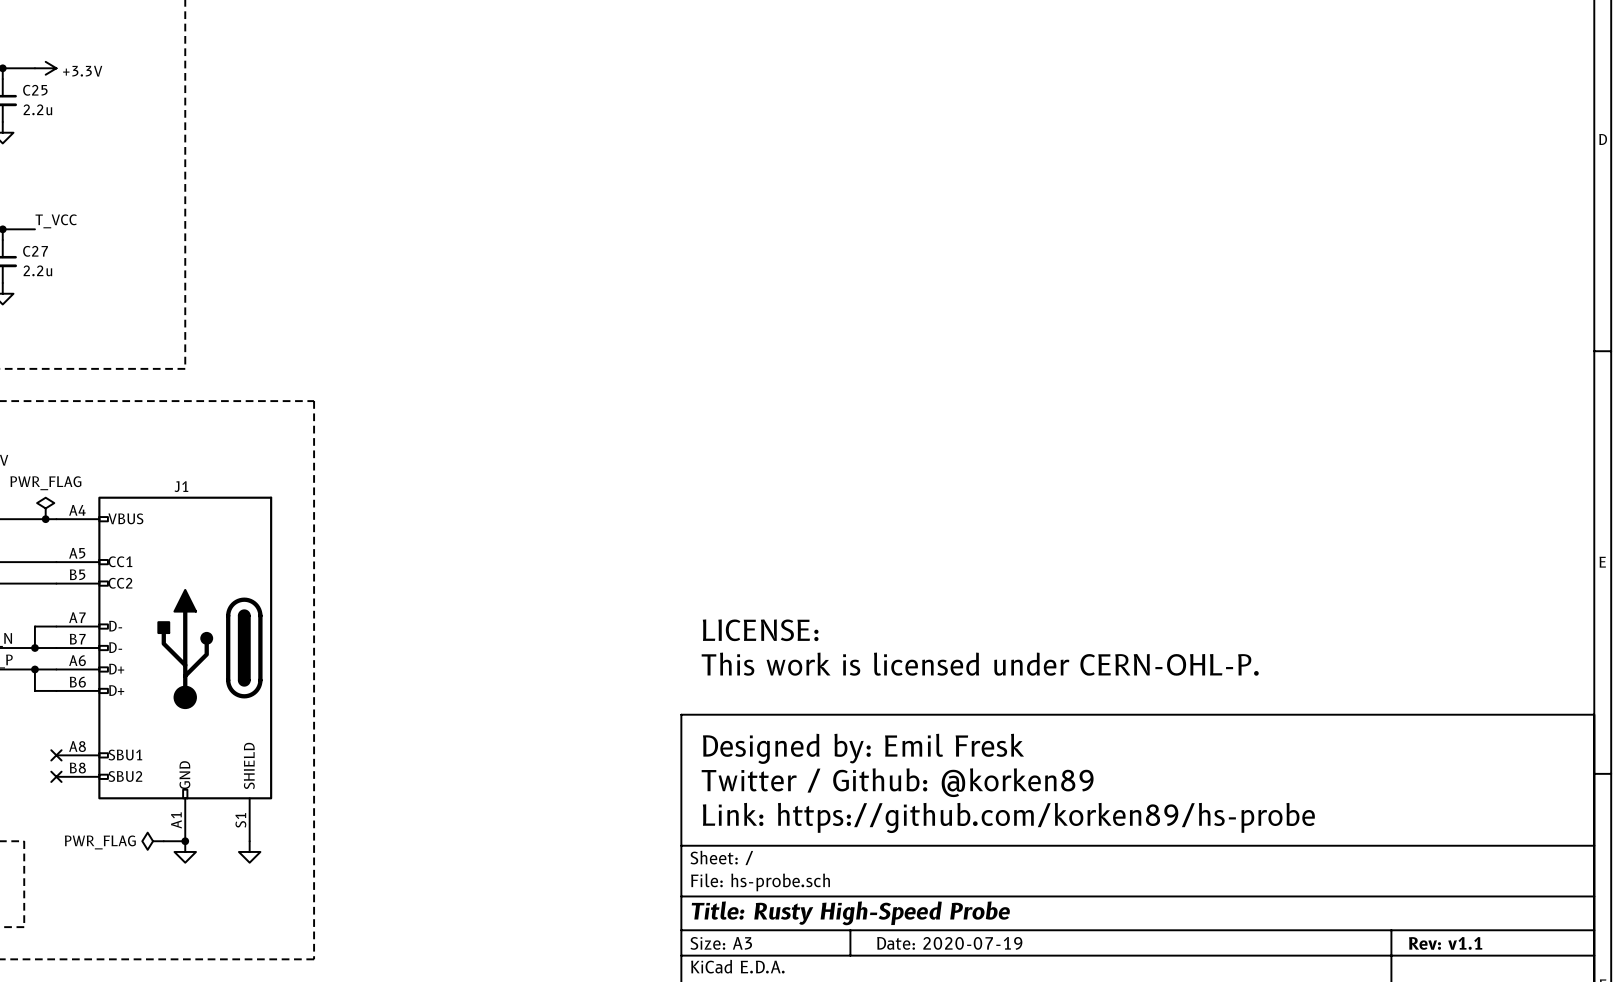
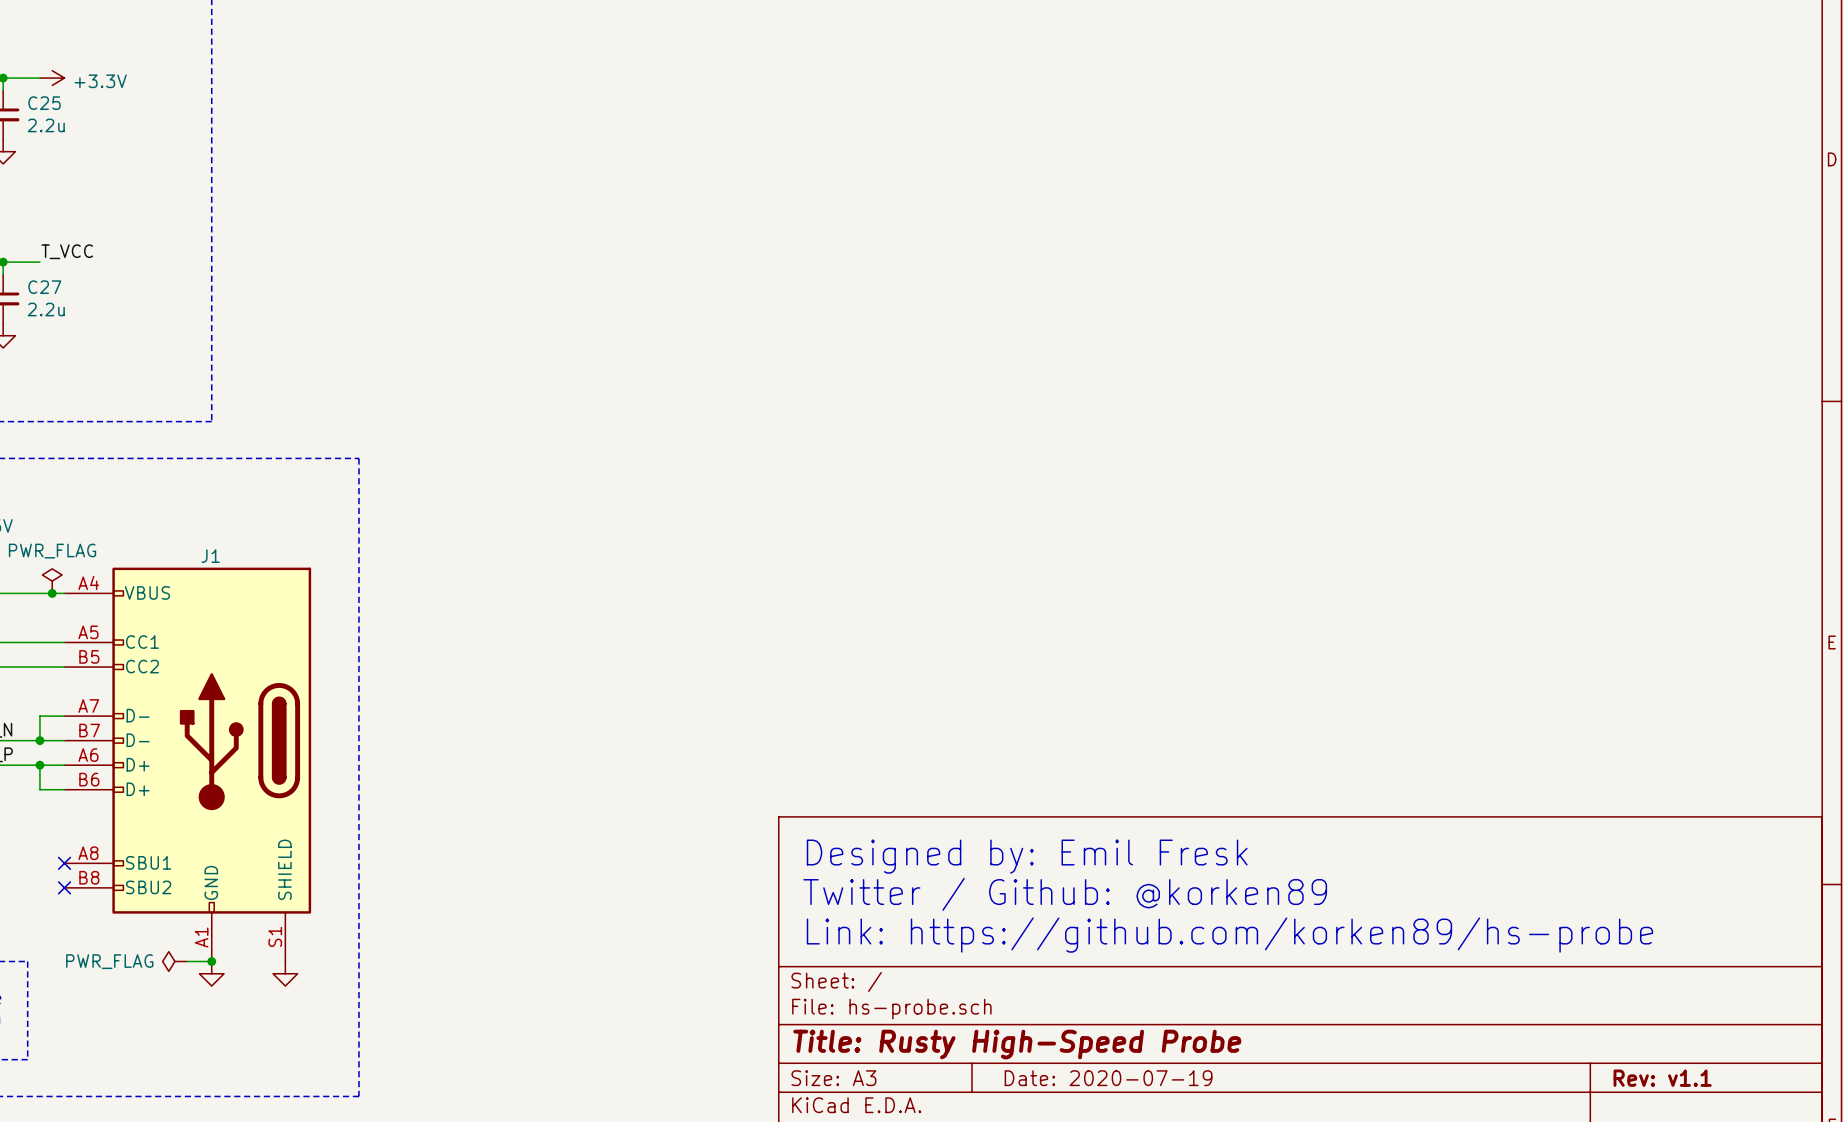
text: LICENSE: (760, 630) -> none
text: This work is licensed under CERN-OHL-P. (980, 664) -> none

